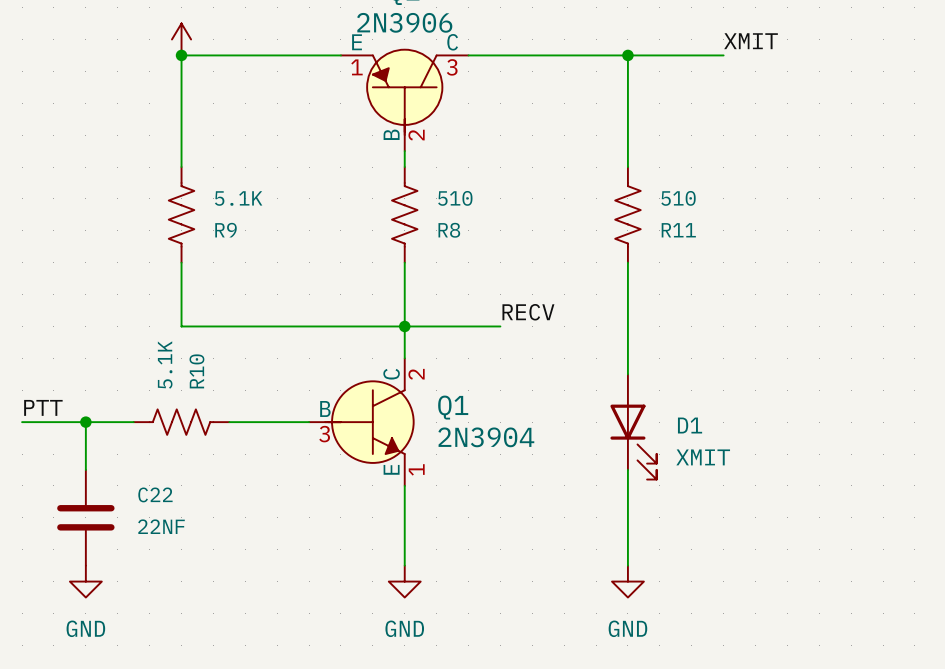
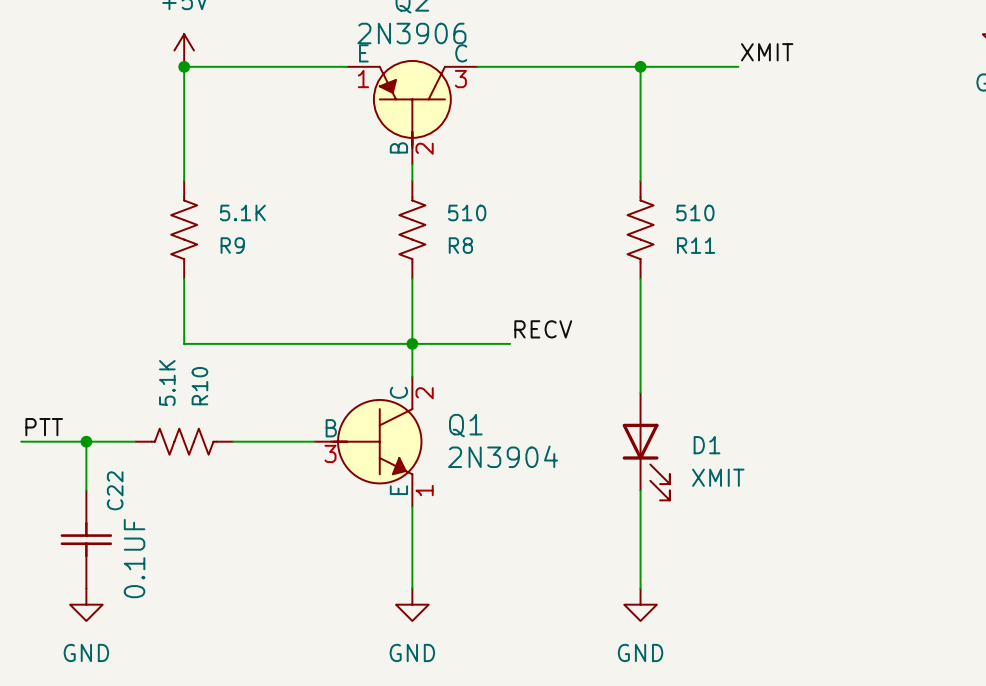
C22 symbol: [57, 469, 115, 566] -> [60, 490, 113, 589]
C22 name rotation: 0° (155, 494) -> 90° counterclockwise (115, 490)
C22 name position: C22 (155, 494) -> C22 (115, 490)
C22 value: 22NF (161, 526) -> 0.1UF (134, 558)

